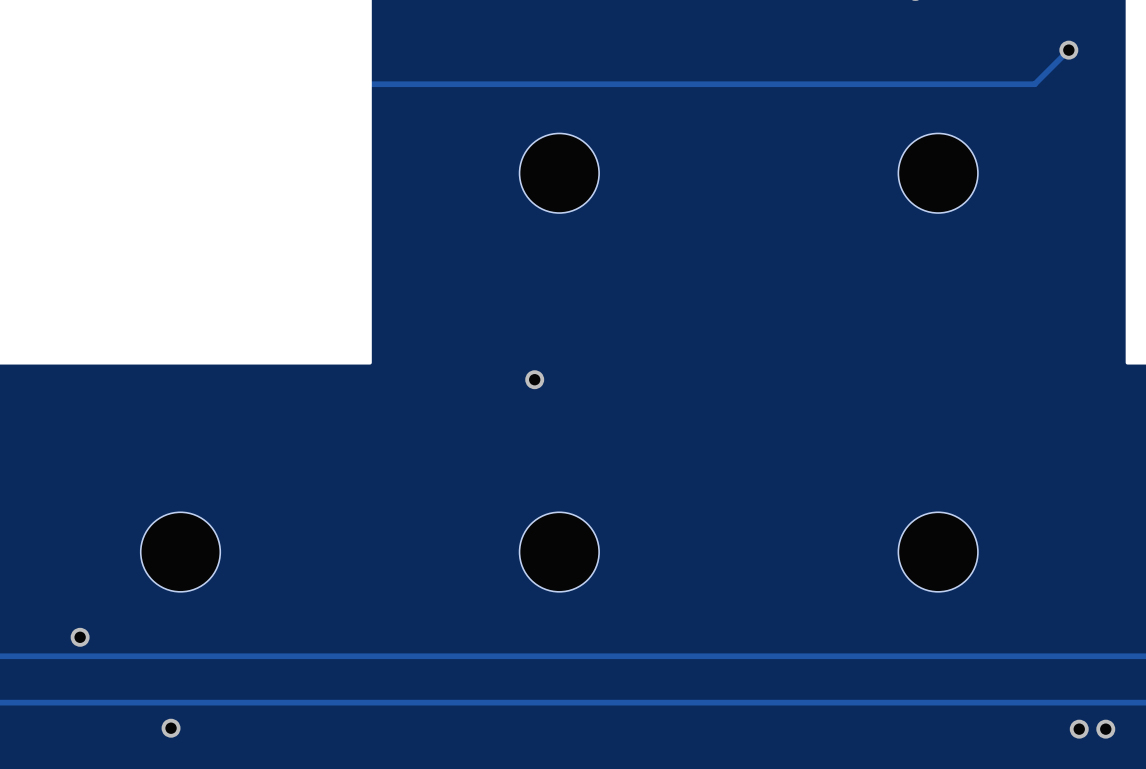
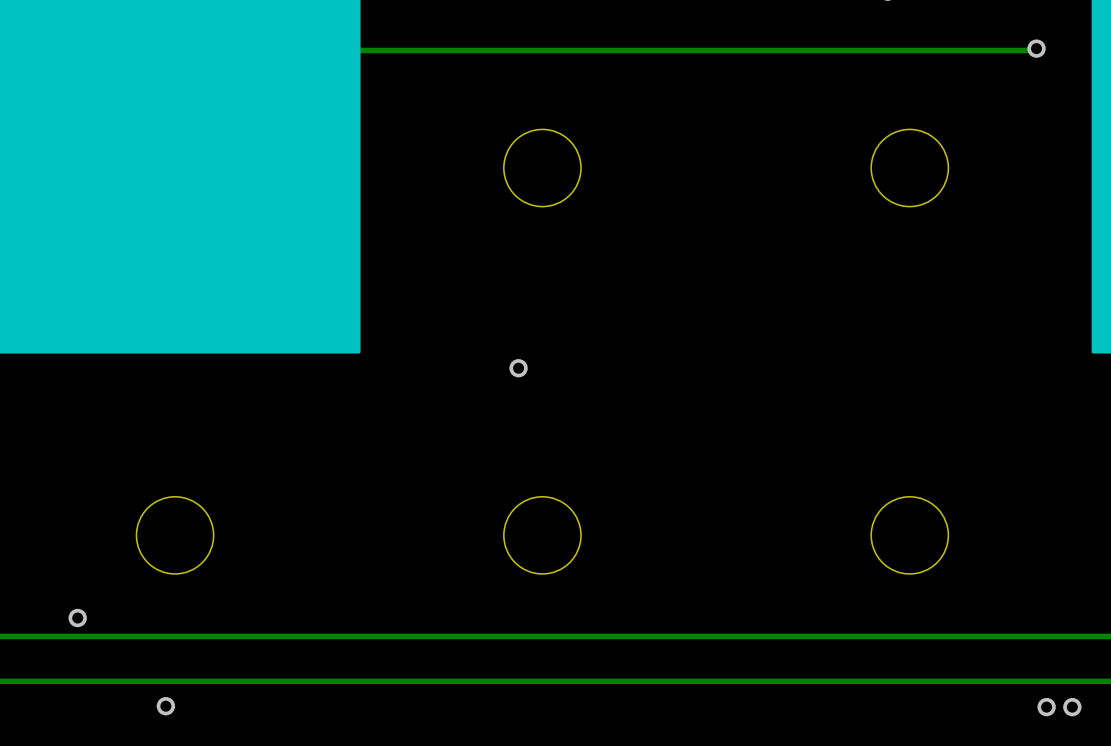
track: (1066, 52) (1034, 84) (152, 84) -> (1034, 50) (178, 50) (147, 81)

